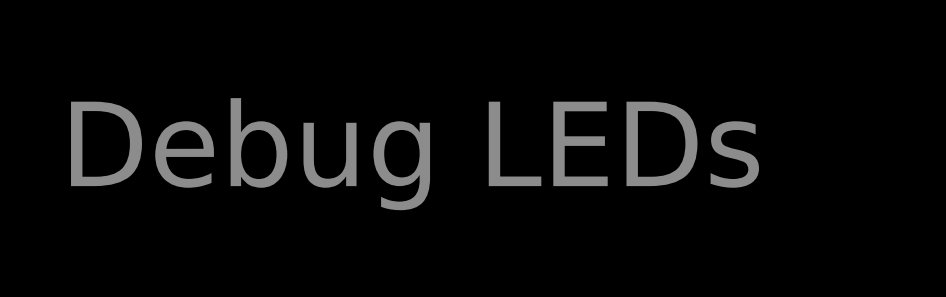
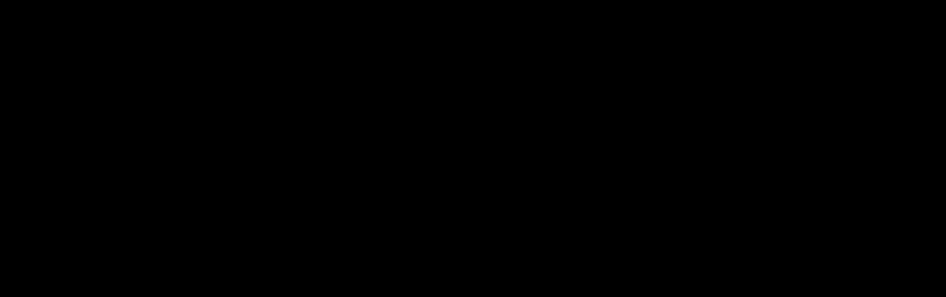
text: Debug LEDs (415, 154) -> none

